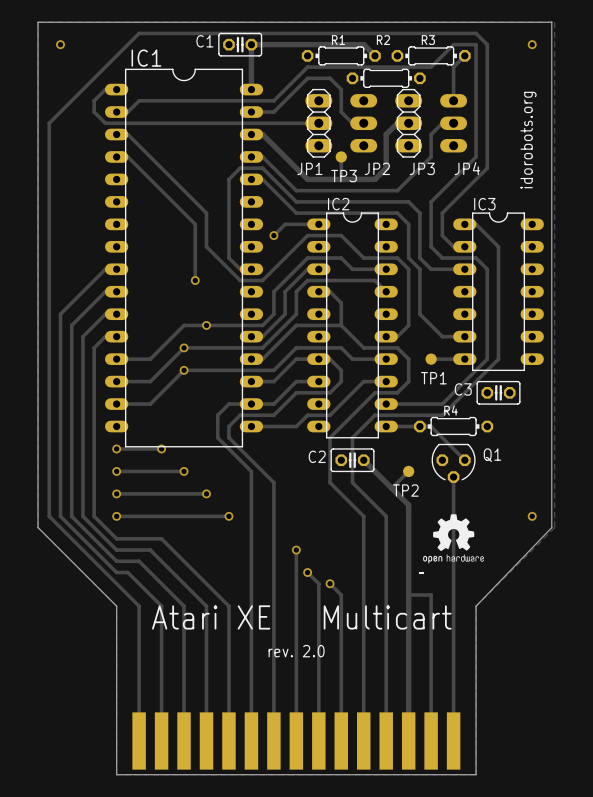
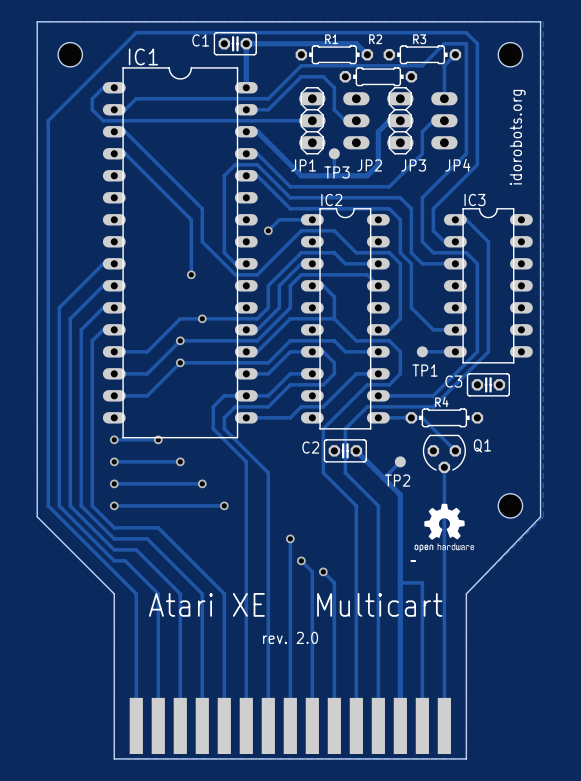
via: (60, 44) -> none
via: (532, 44) -> none
hole: none -> (70, 54)
hole: none -> (510, 54)
hole: none -> (510, 505)
via: (532, 516) -> none

